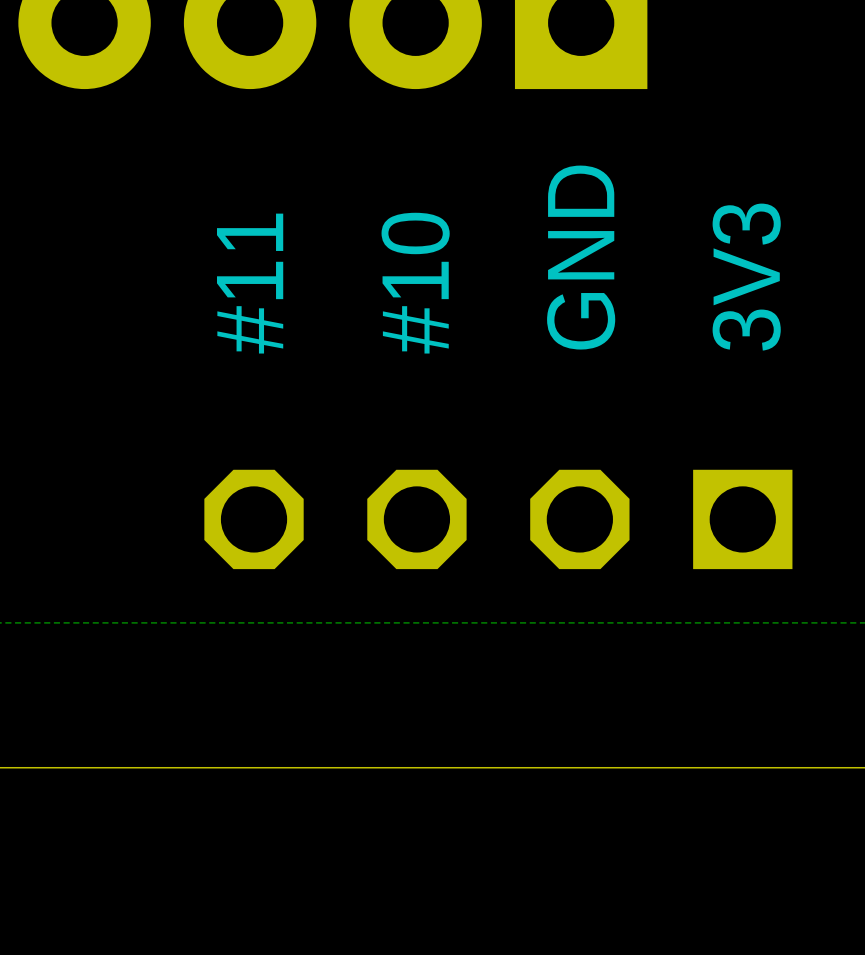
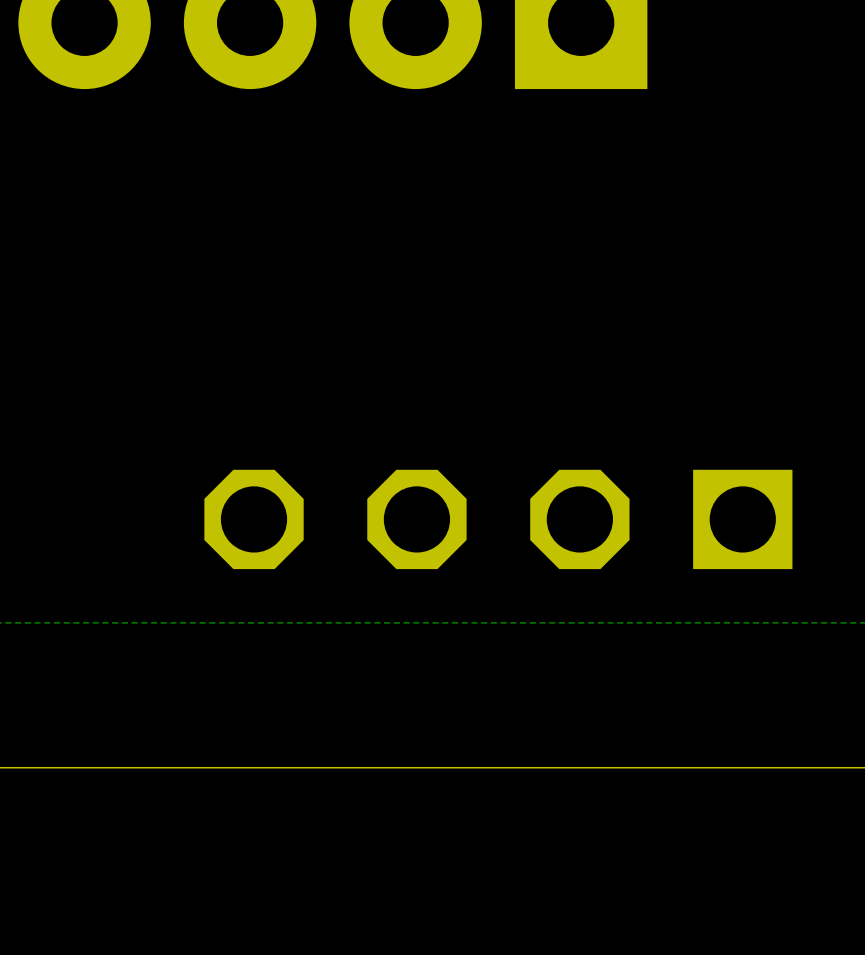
text: GND (581, 257) -> none
text: 3V3 (746, 277) -> none
text: #11 (250, 283) -> none
text: #10 (415, 283) -> none

